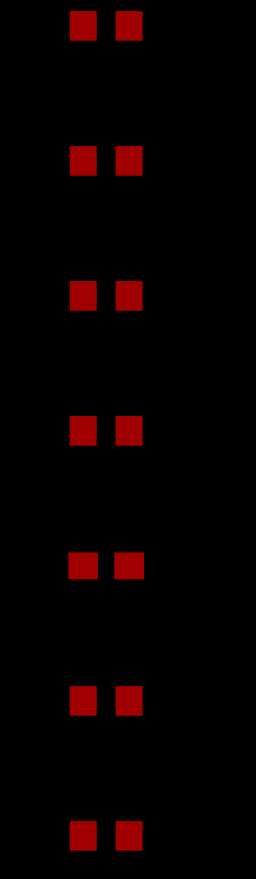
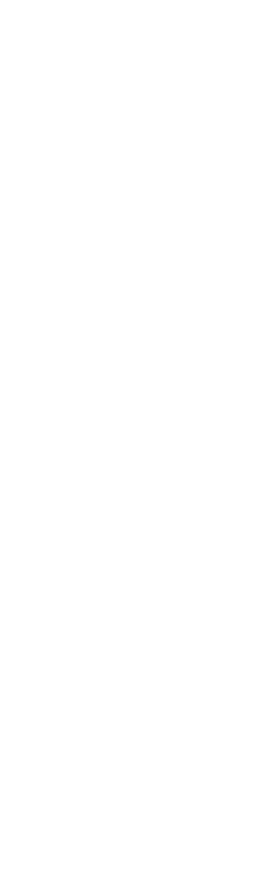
part: (106, 25) -> none
part: (106, 160) -> none
part: (106, 295) -> none
part: (106, 430) -> none
part: (106, 565) -> none
part: (106, 700) -> none
part: (106, 835) -> none

